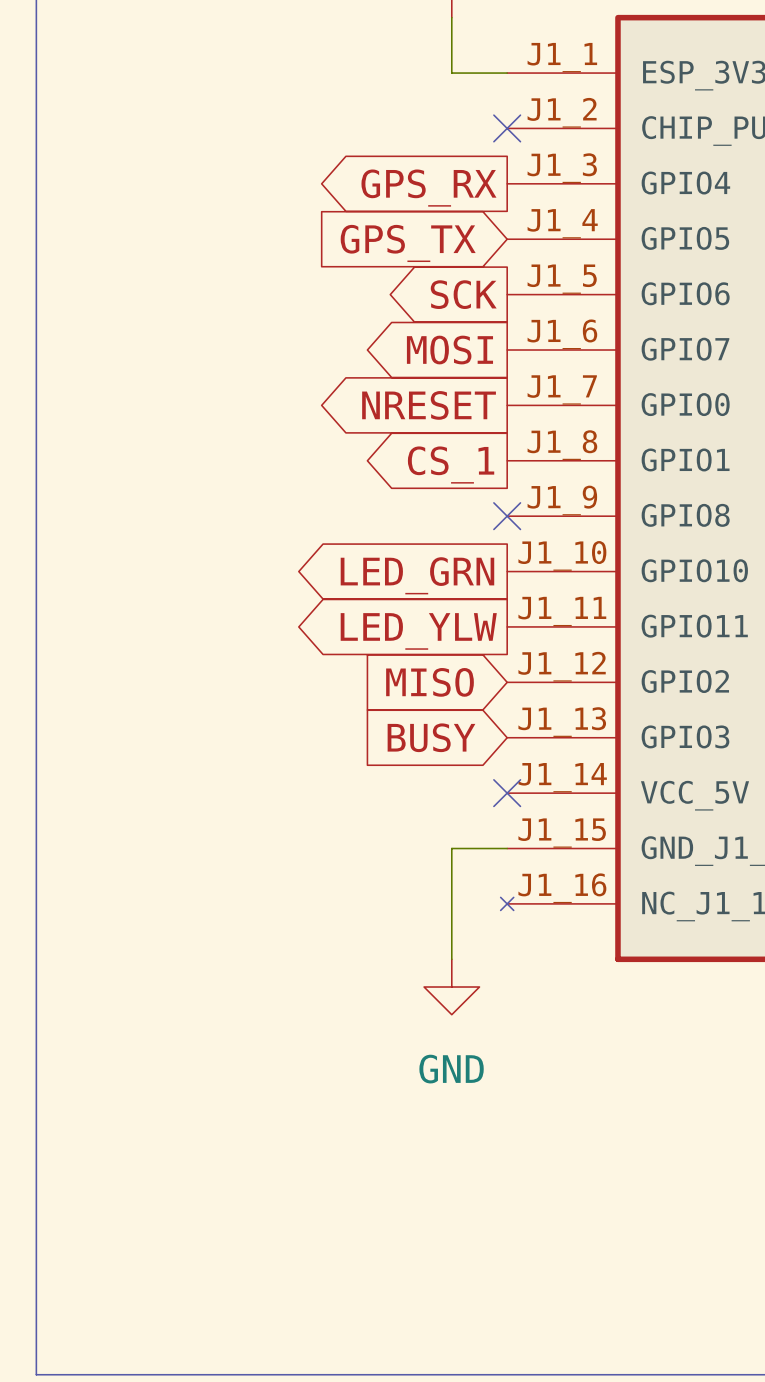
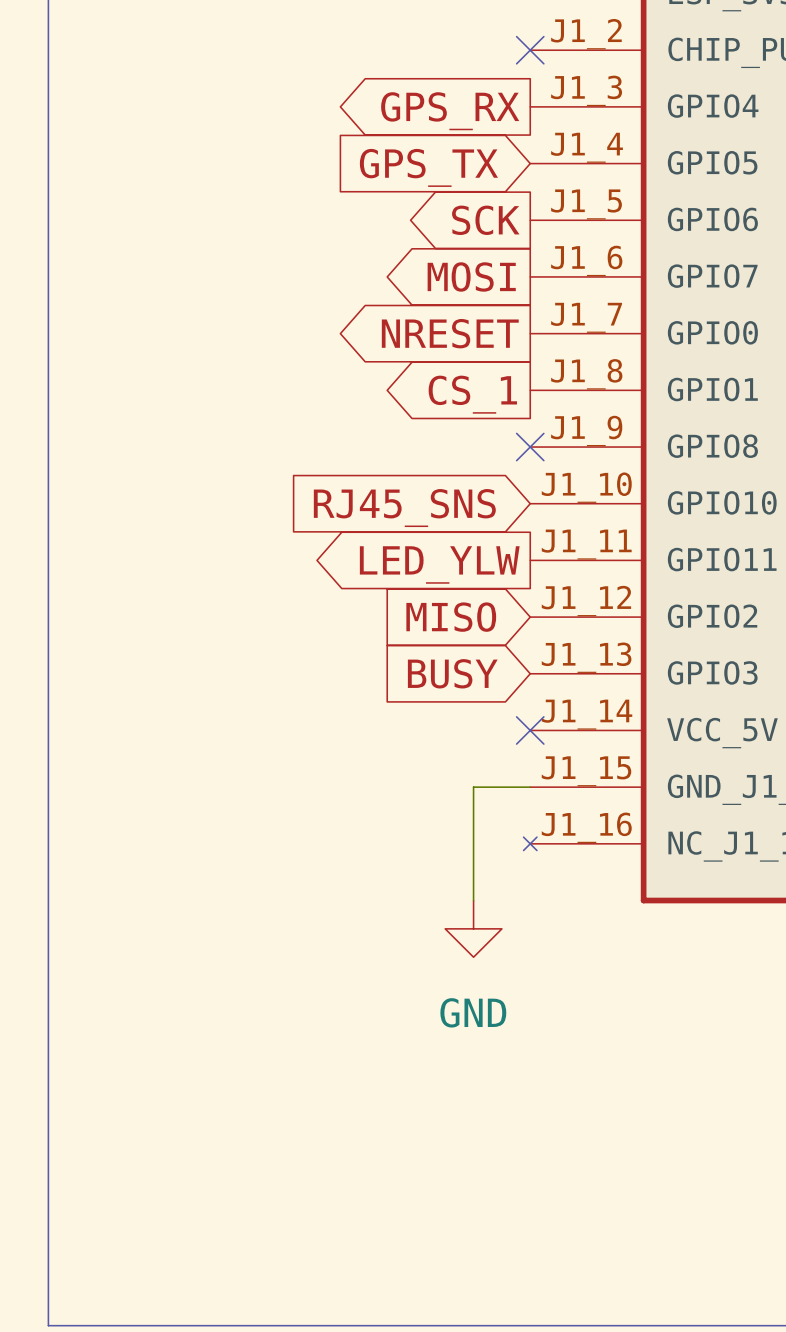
global label shape: output (417, 575) -> input (404, 508)
global label: LED_GRN (417, 575) -> RJ45_SNS (404, 508)

